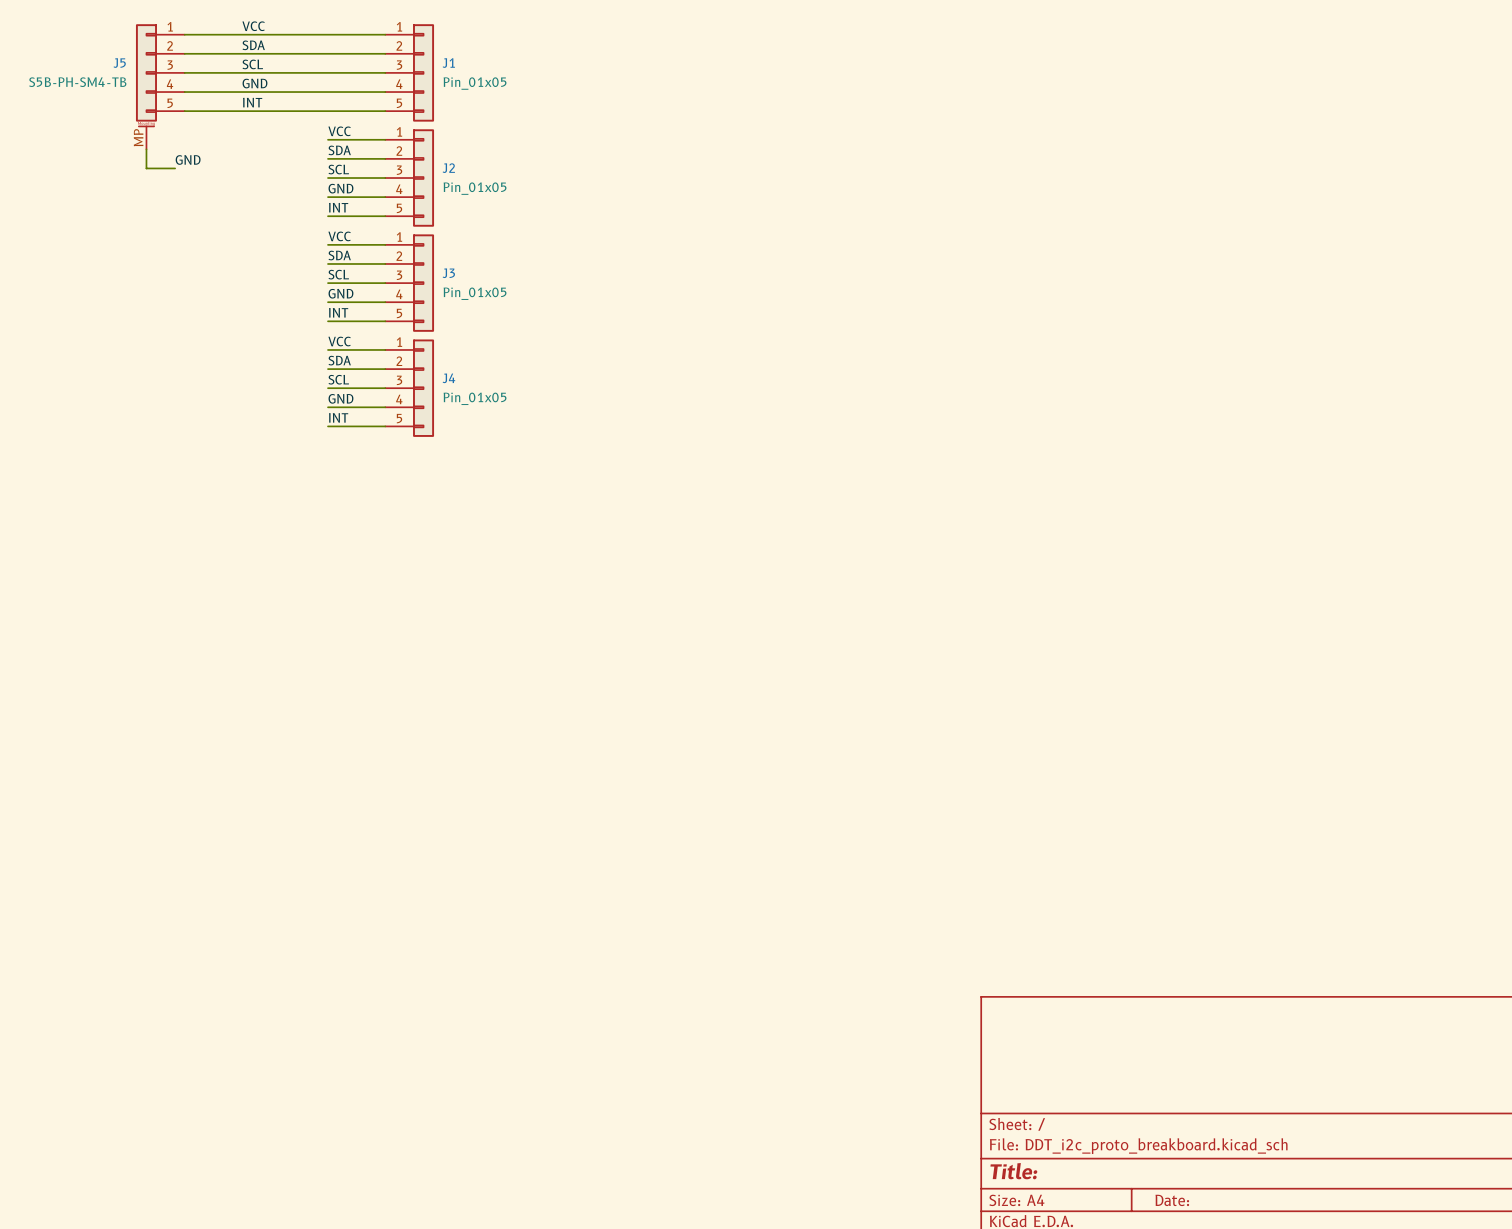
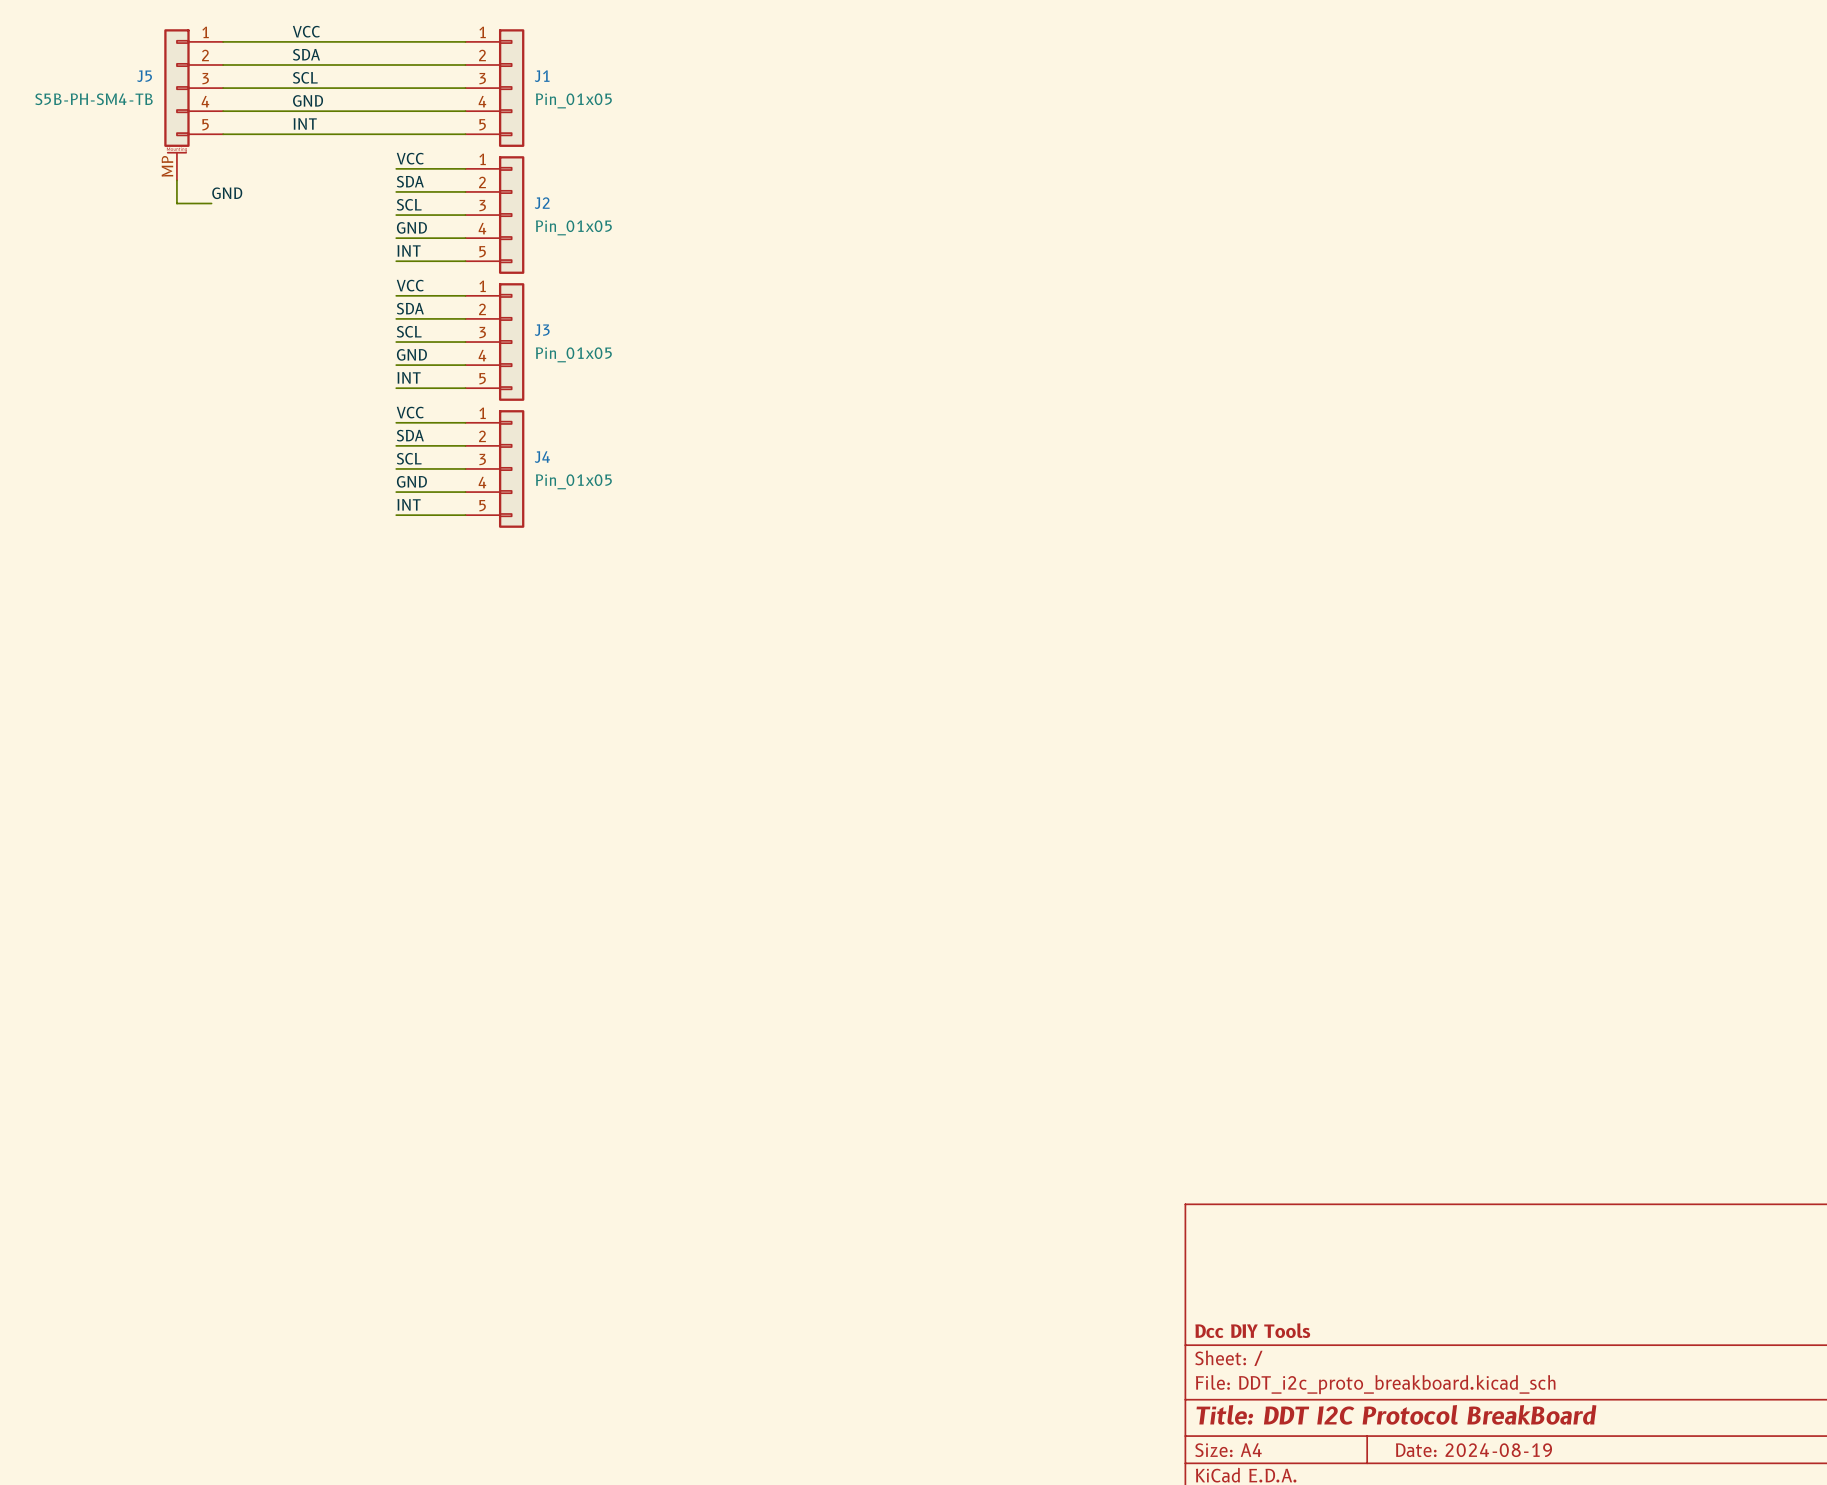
title block: none -> Dcc DIY Tools (1252, 1330)
title block: Title: (1013, 1171) -> Title: DDT I2C Protocol BreakBoard (1396, 1414)
title block: Date: (1172, 1200) -> Date: 2024-08-19 (1473, 1450)

